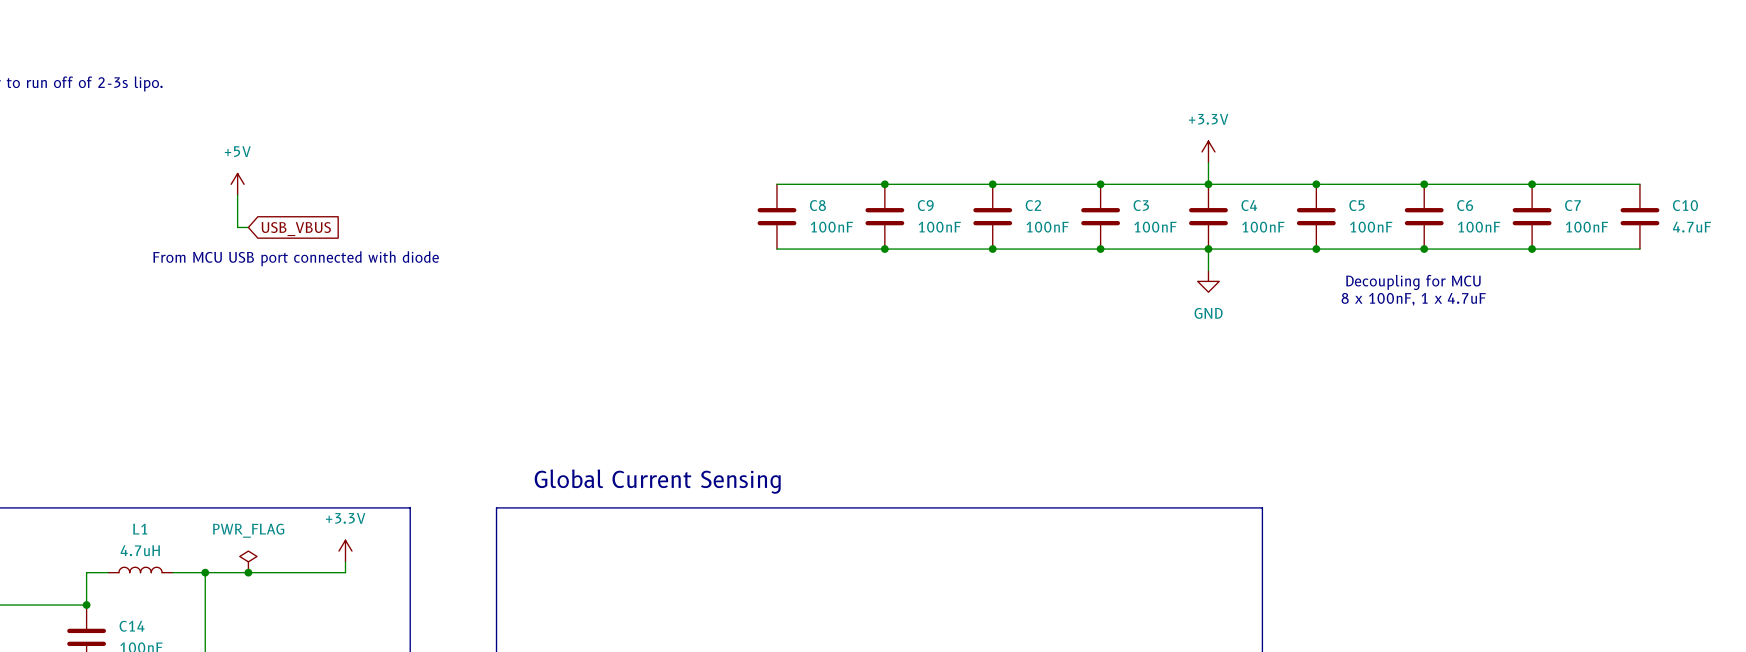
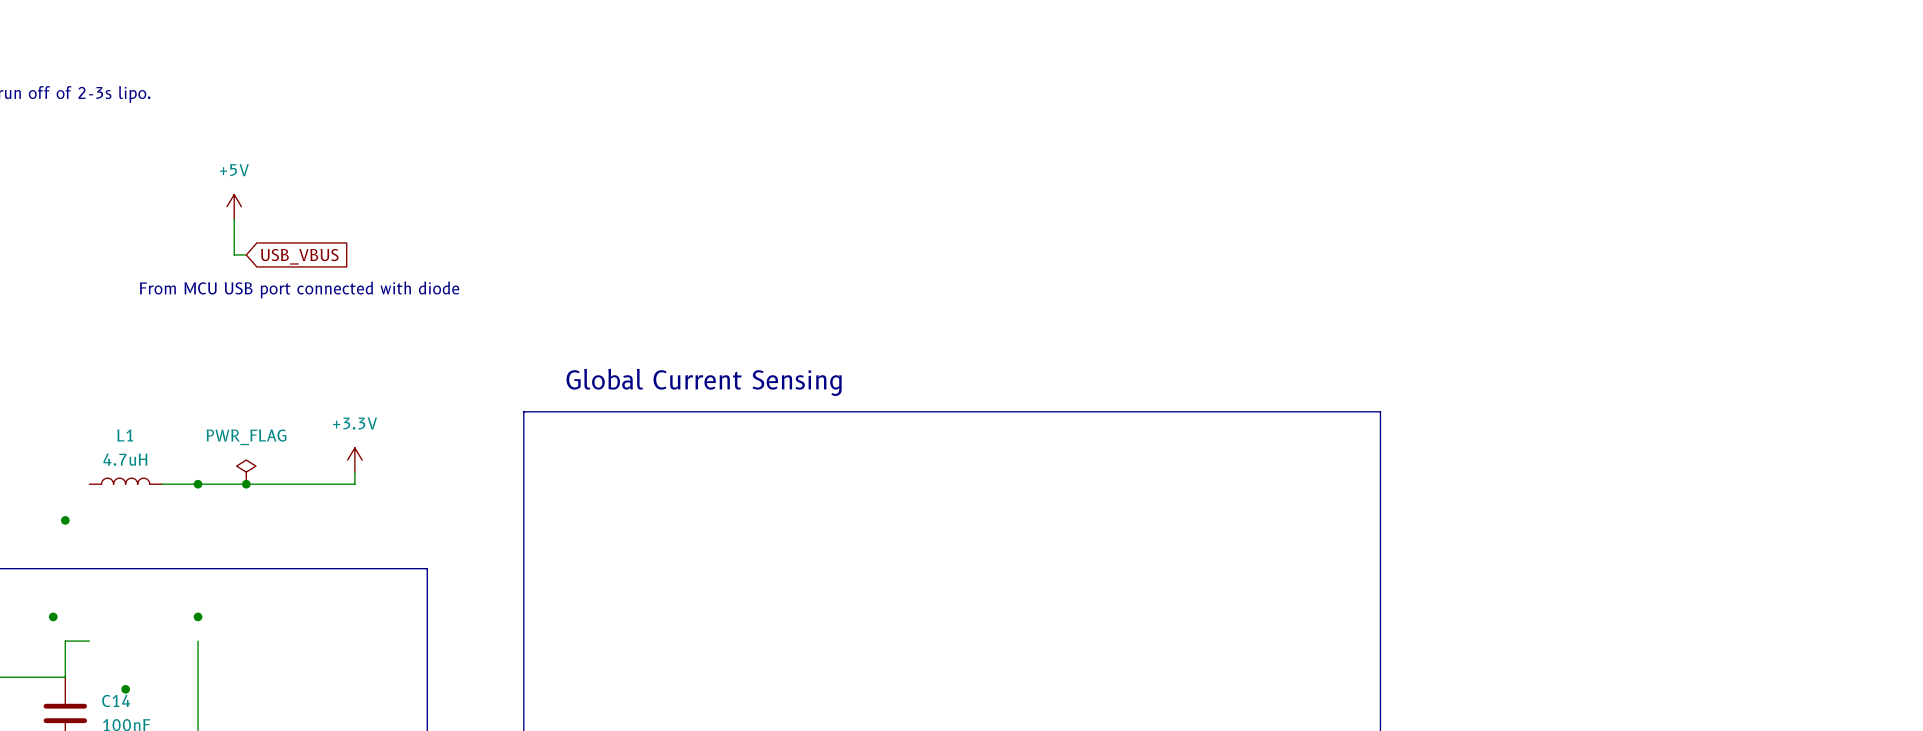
power symbol: +3.3V (1208, 151) -> none
wire: (1208, 162) (1208, 184) -> none
wire: (776, 184) (1639, 184) -> none
junction: (884, 184) -> none
junction: (992, 184) -> none
junction: (1100, 184) -> none
junction: (1208, 184) -> none
junction: (1316, 184) -> none
junction: (1424, 184) -> none
junction: (1532, 184) -> none
C8: 100nF (776, 216) -> none
C9: 100nF (884, 216) -> none
C2: 100nF (992, 216) -> none
C3: 100nF (1100, 216) -> none
C4: 100nF (1208, 216) -> none
C5: 100nF (1316, 216) -> none
C6: 100nF (1424, 216) -> none
C7: 100nF (1532, 216) -> none
C10: 4.7uF (1639, 216) -> none
wire: (776, 249) (1639, 249) -> none
junction: (884, 249) -> none
junction: (992, 249) -> none
junction: (1100, 249) -> none
wire: (1208, 249) (1208, 270) -> none
junction: (1208, 249) -> none
junction: (1316, 249) -> none
junction: (1424, 249) -> none
junction: (1532, 249) -> none
power symbol: GND (1208, 281) -> none
text: Decoupling for MCU (1413, 282) -> none
text: 8 x 100nF, 1 x 4.7uF (1413, 299) -> none
junction: none -> (198, 484)
junction: none -> (246, 484)
junction: none -> (65, 520)
text position: Global Current Sensing (657, 481) -> Global Current Sensing (704, 382)
line: (496, 507) (1262, 507) -> (523, 568) (523, 411) (1380, 411) (1380, 568)
junction: none -> (53, 616)
power symbol position: +3.3V (345, 551) -> +3.3V (354, 460)
power symbol position: PWR_FLAG (248, 561) -> PWR_FLAG (246, 472)
wire: (345, 561) (345, 572) (172, 572) -> (354, 472) (354, 484) (161, 484)
L1 position: (140, 569) -> (125, 481)
junction position: (205, 572) -> (198, 616)
junction: (248, 572) -> none
junction: (86, 605) -> none
junction: none -> (125, 689)

